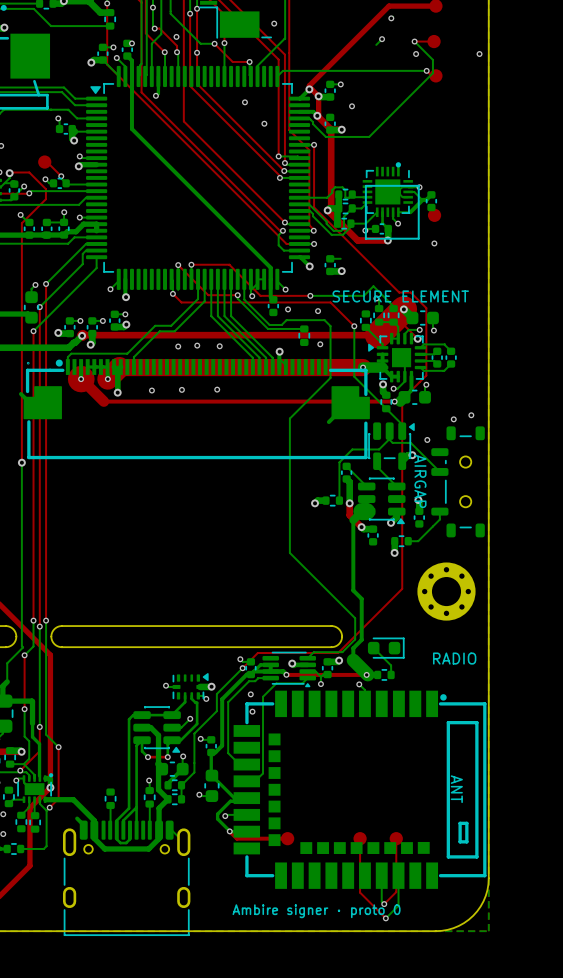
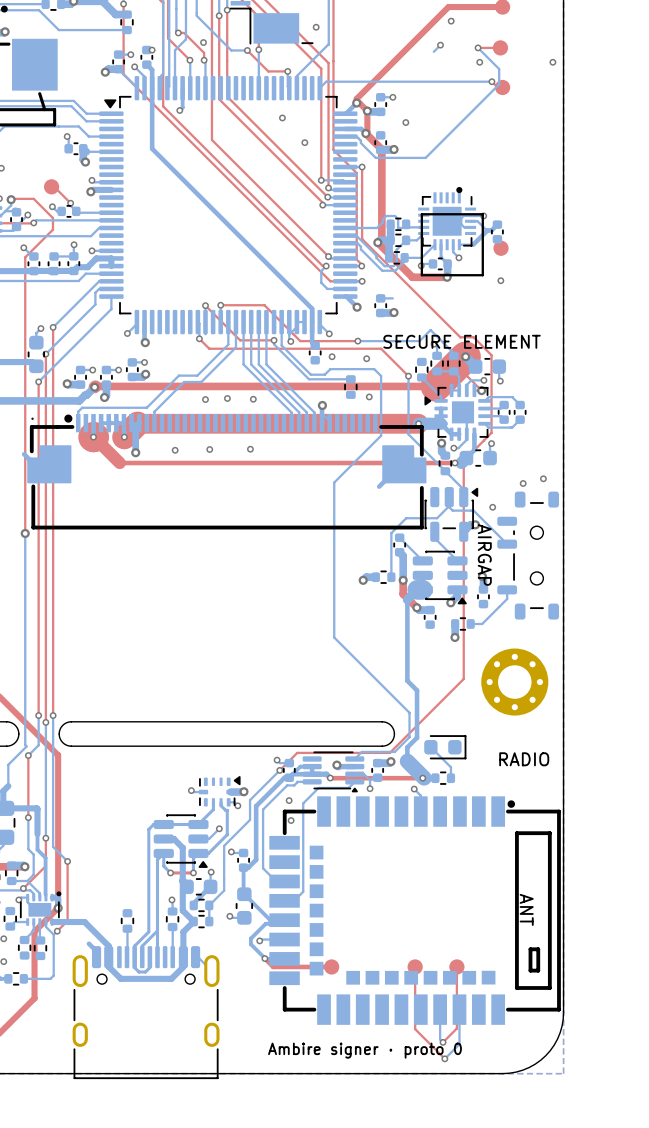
via: (152, 7) -> none
via: (197, 52) -> none

